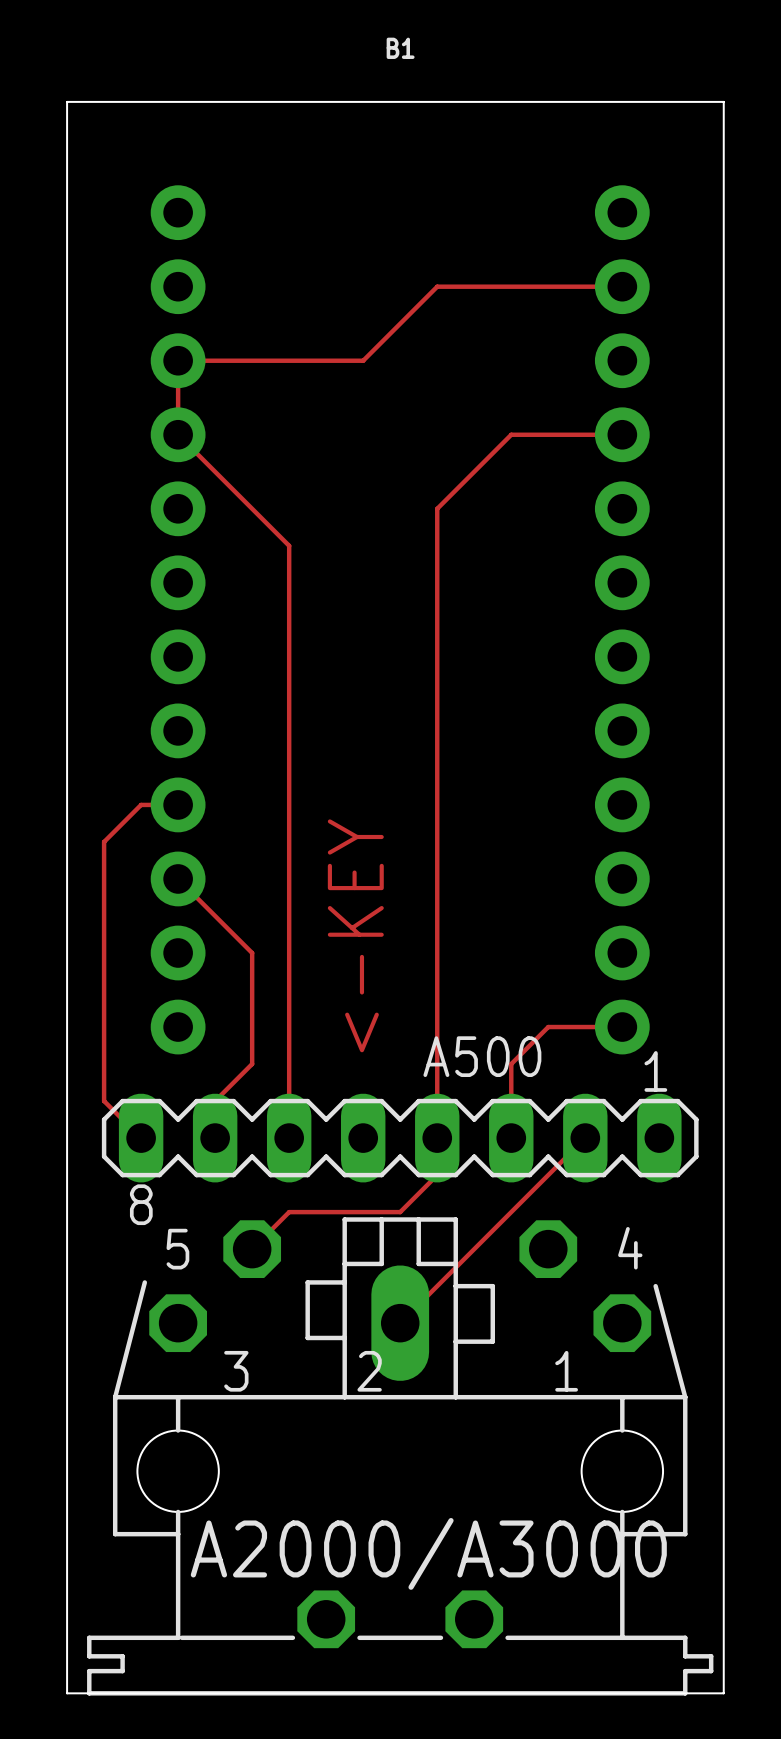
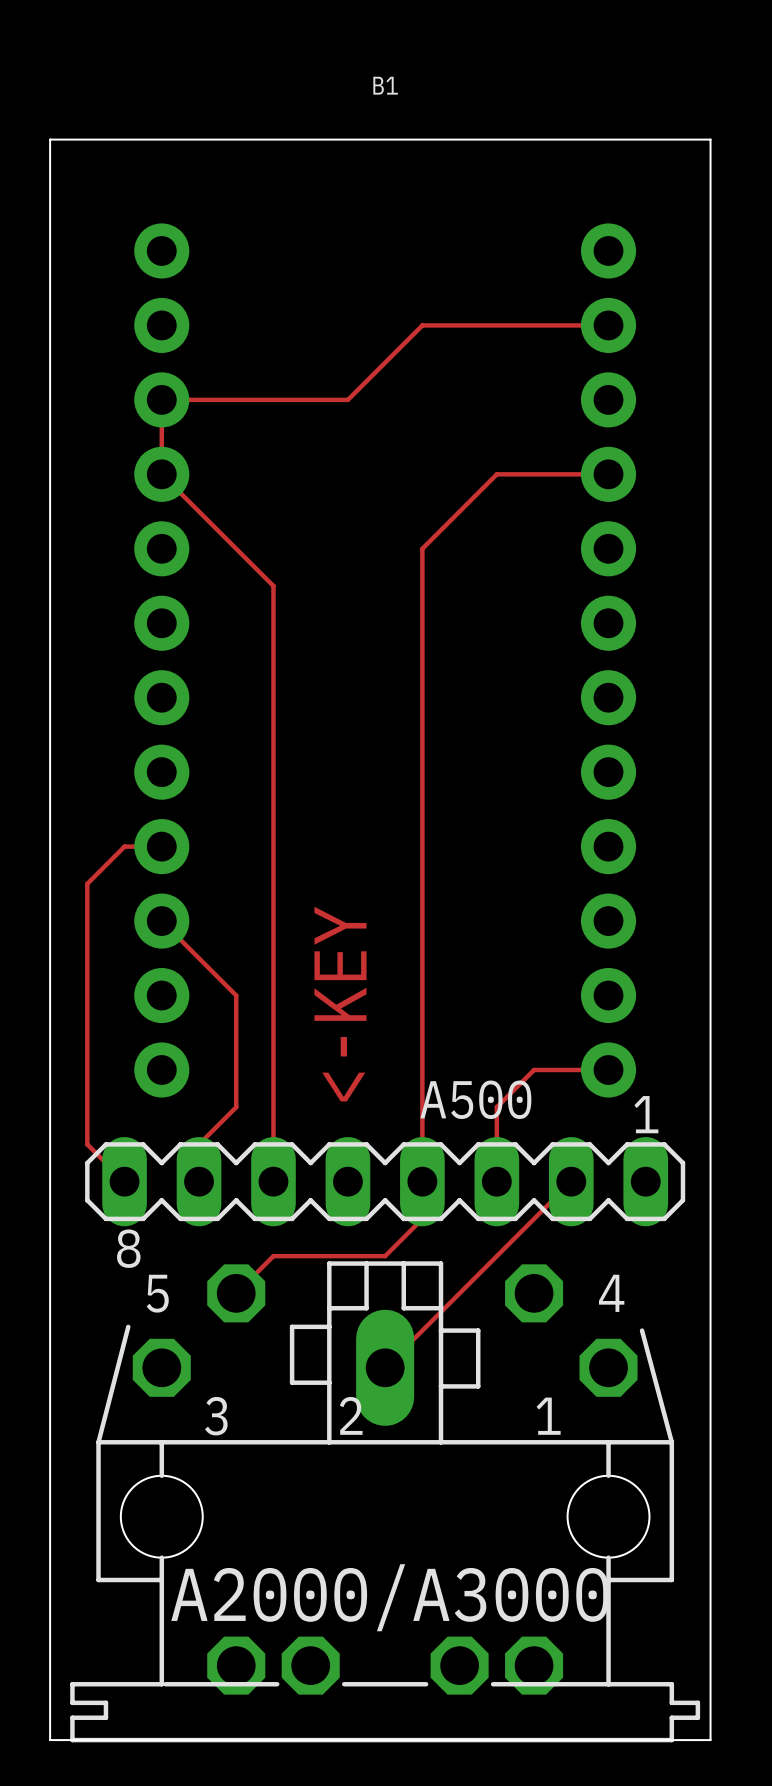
A2000/A3000 footprint: [87, 1217, 714, 1696] -> [70, 1261, 701, 1743]

